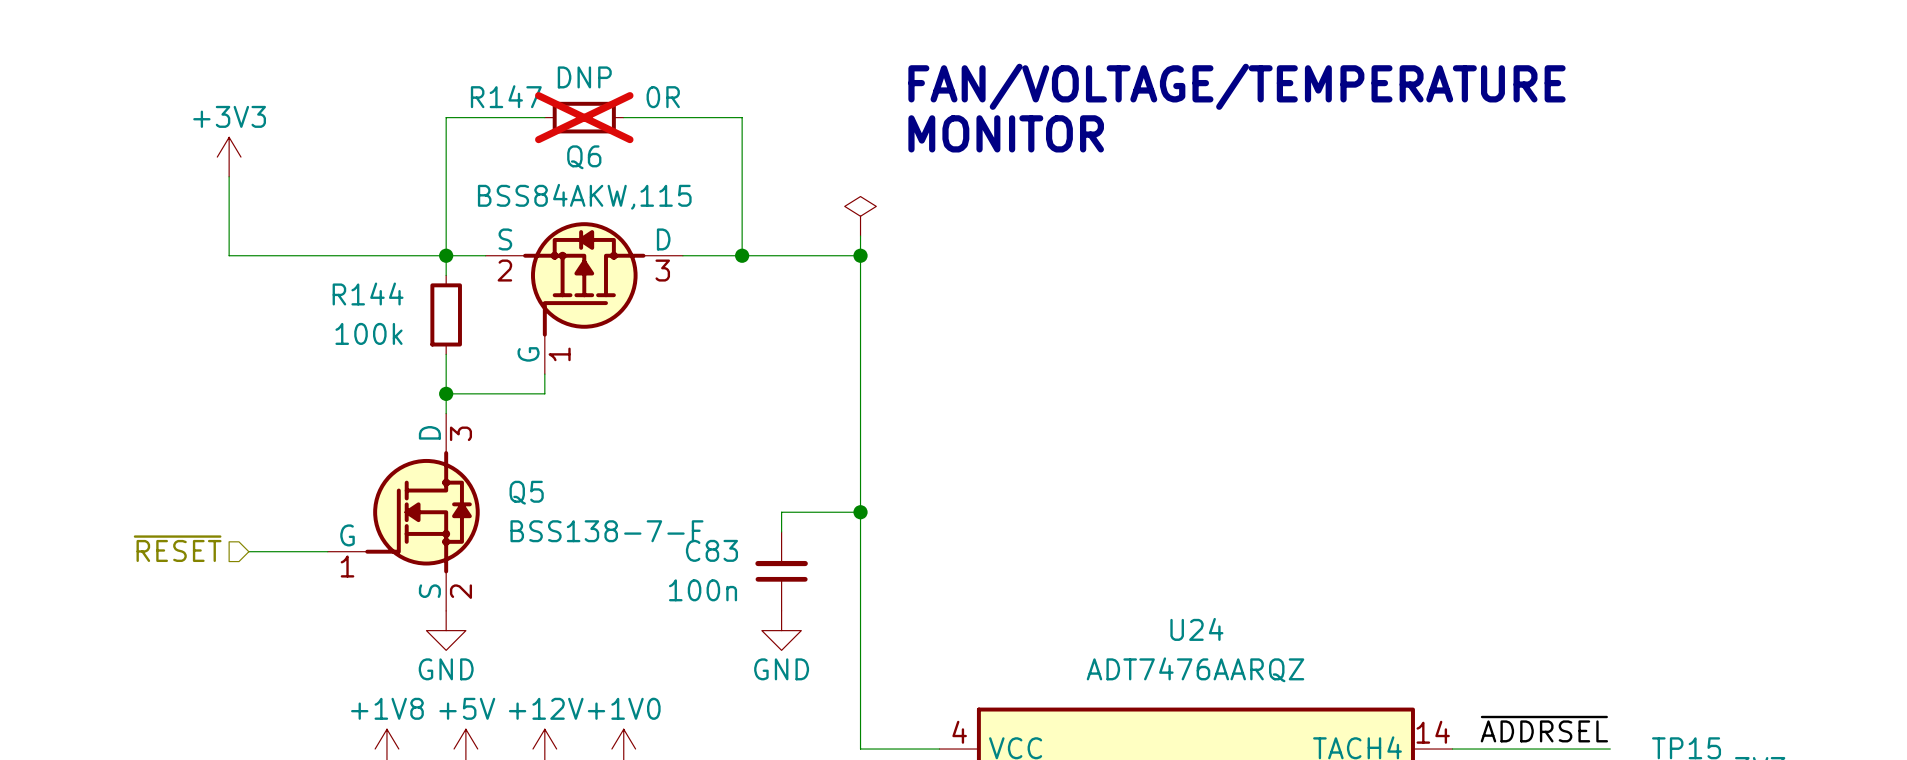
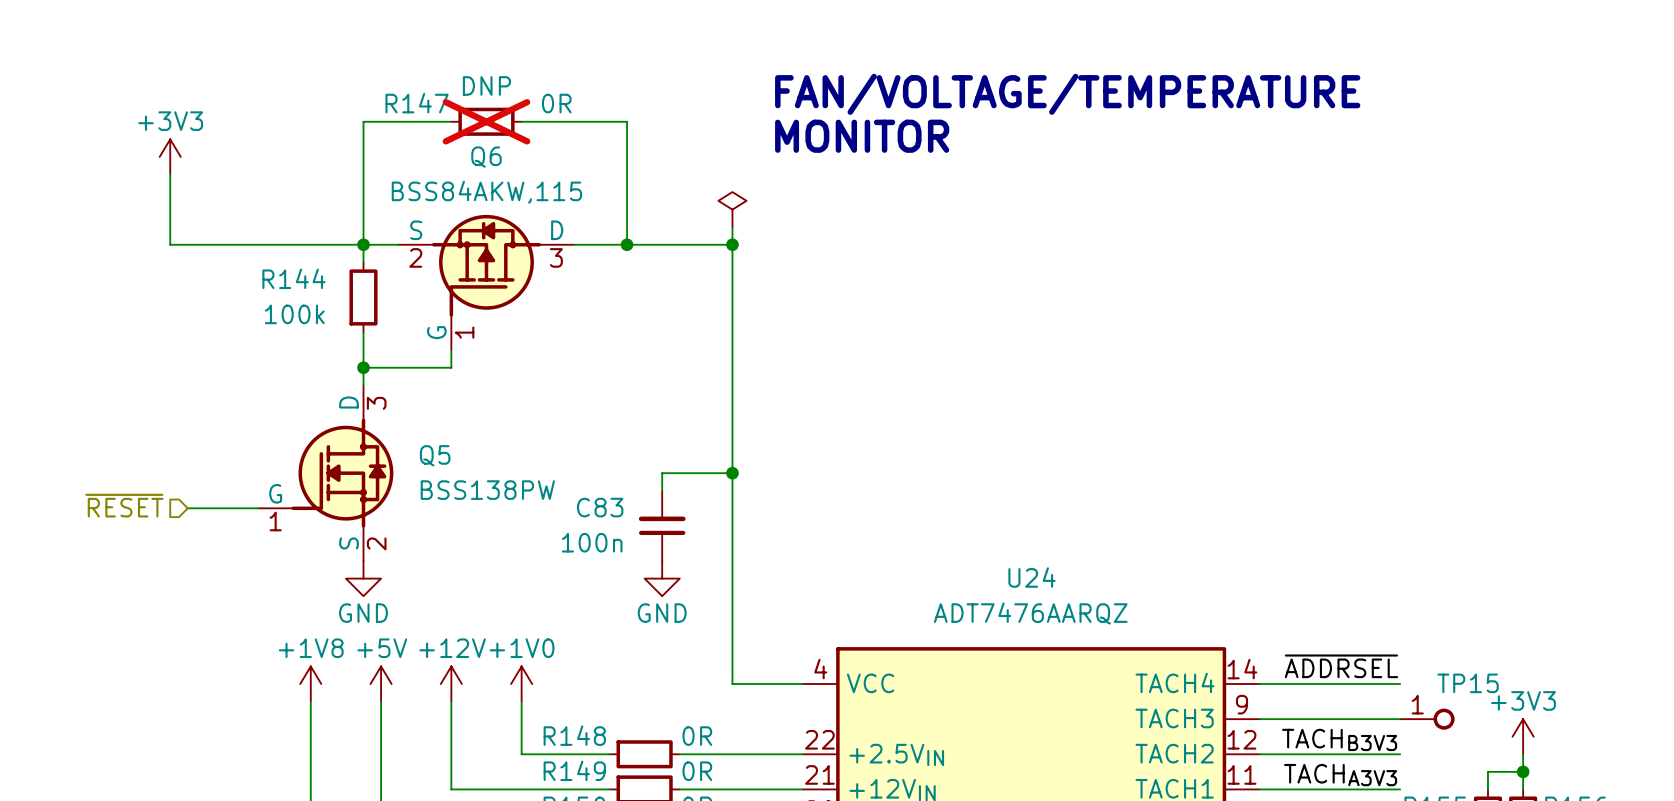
Q5 symbol: [327, 413, 480, 611] -> [258, 385, 394, 562]
Q5 value: BSS138-7-F (606, 531) -> BSS138PW (487, 490)

